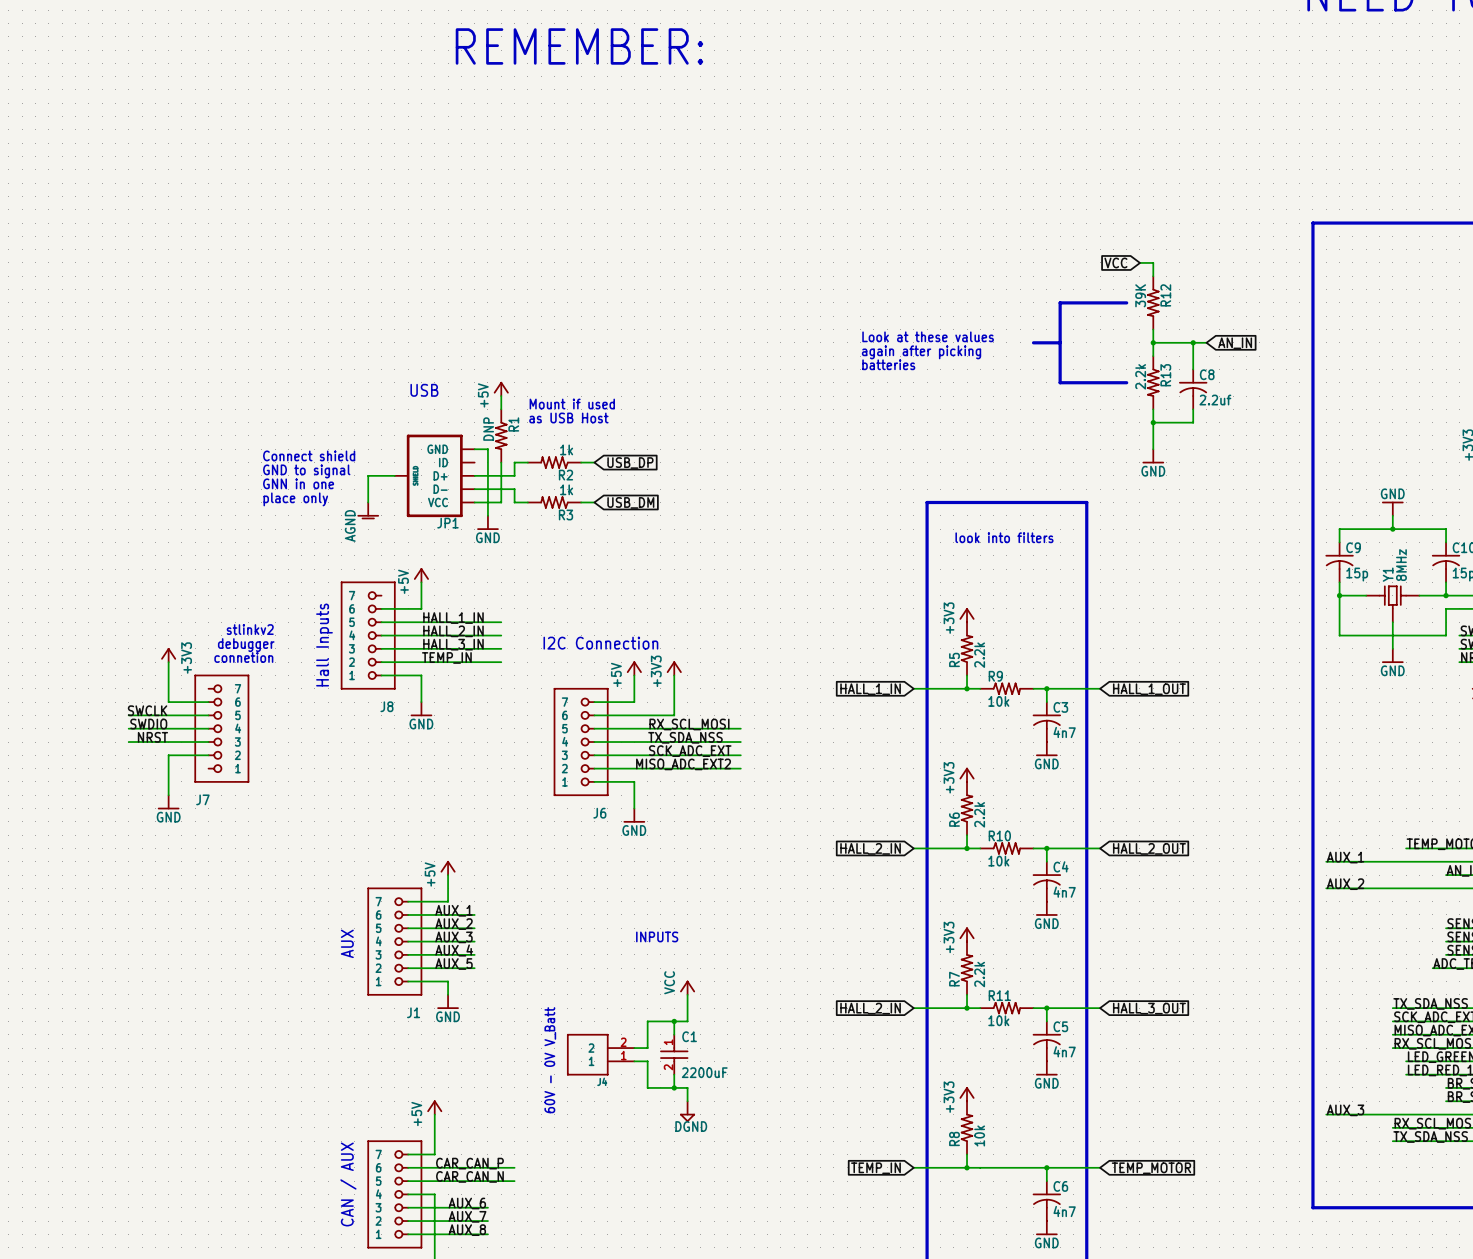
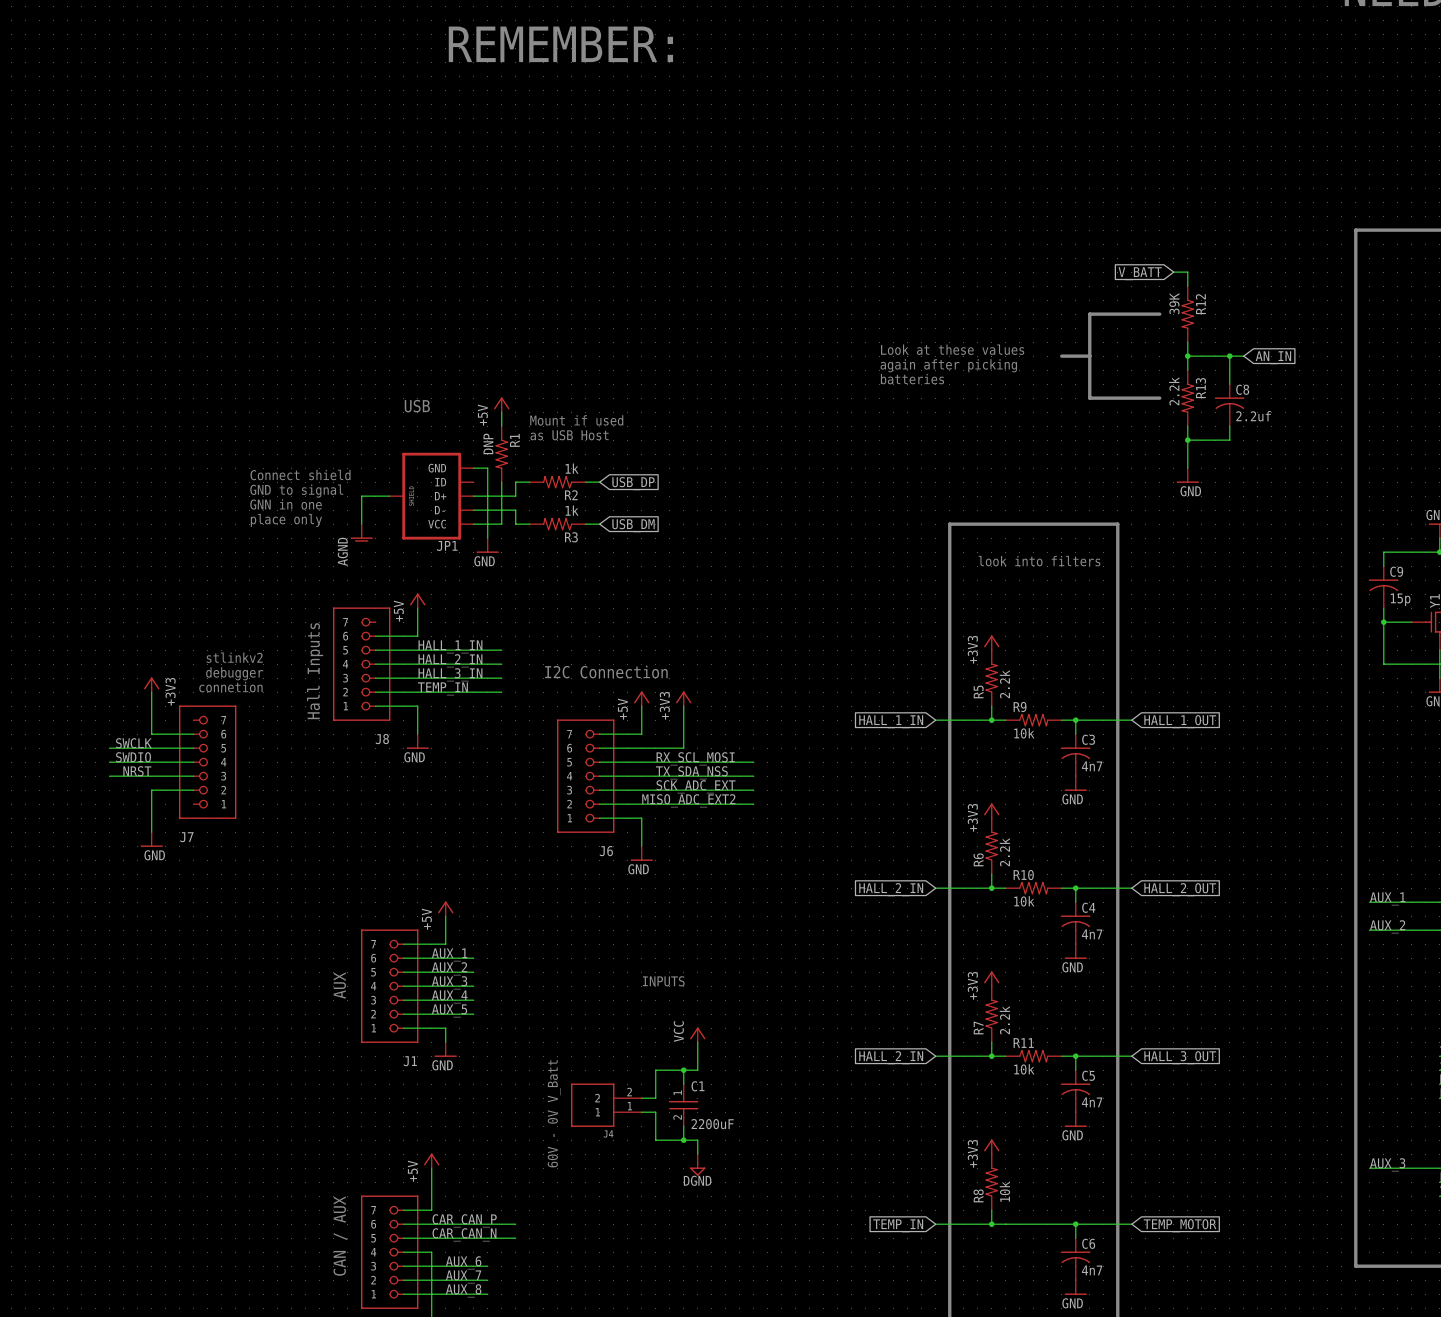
global label: VCC (1115, 262) -> V_BATT (1140, 273)

